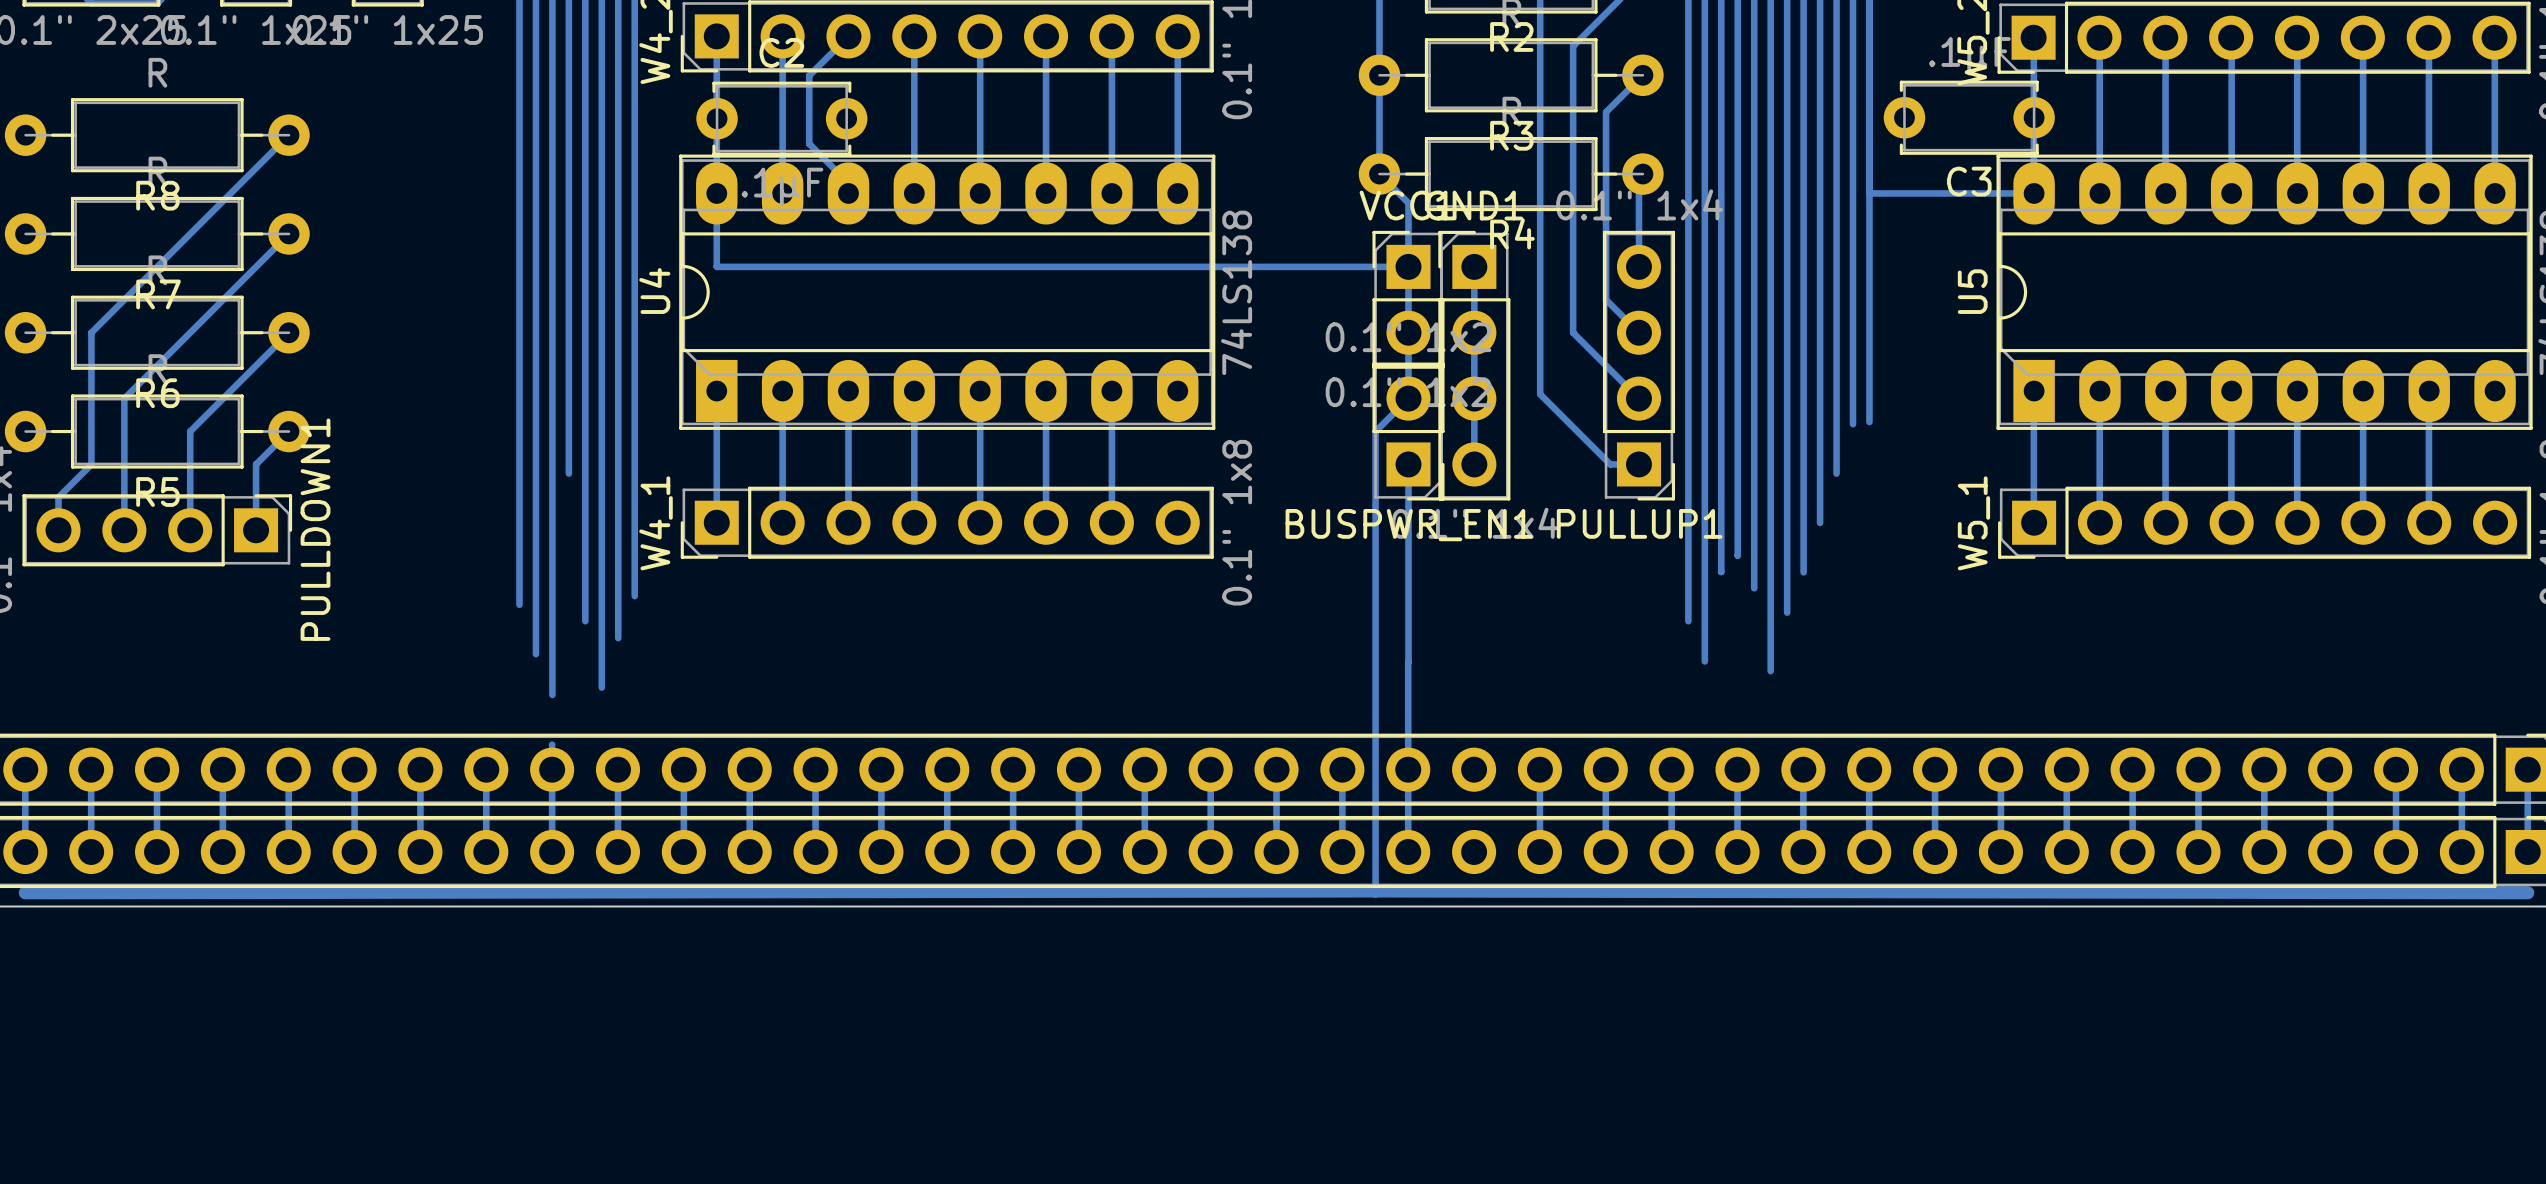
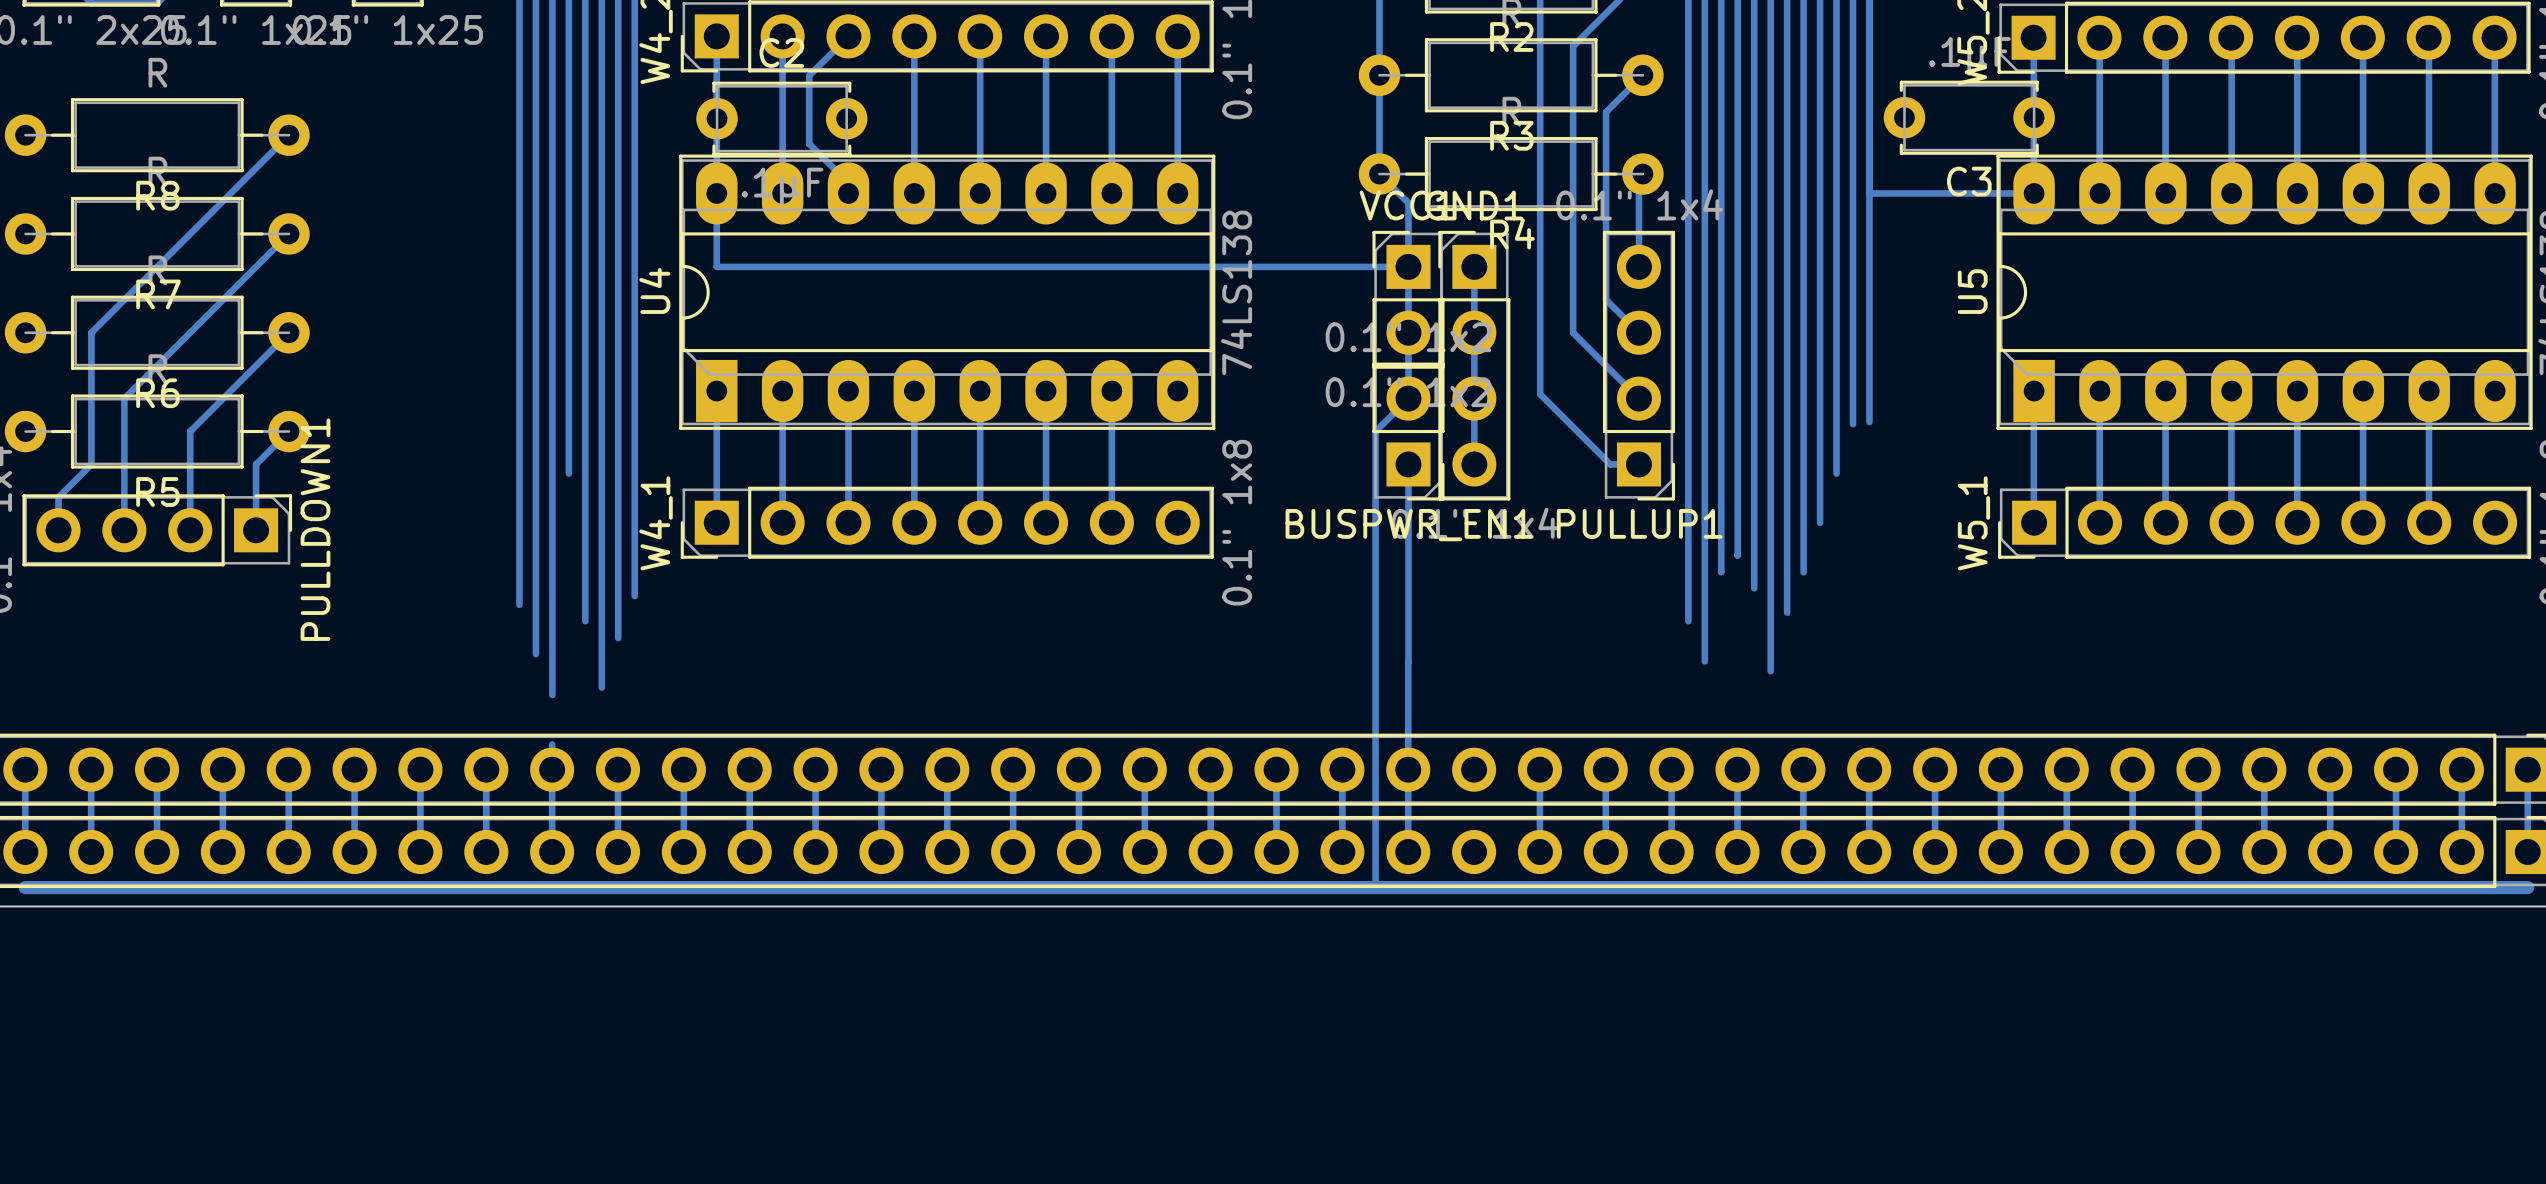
bottom track: none -> (25, 887) (2527, 887)
bottom track: (25, 892) (1375, 890) (2527, 892) -> none

